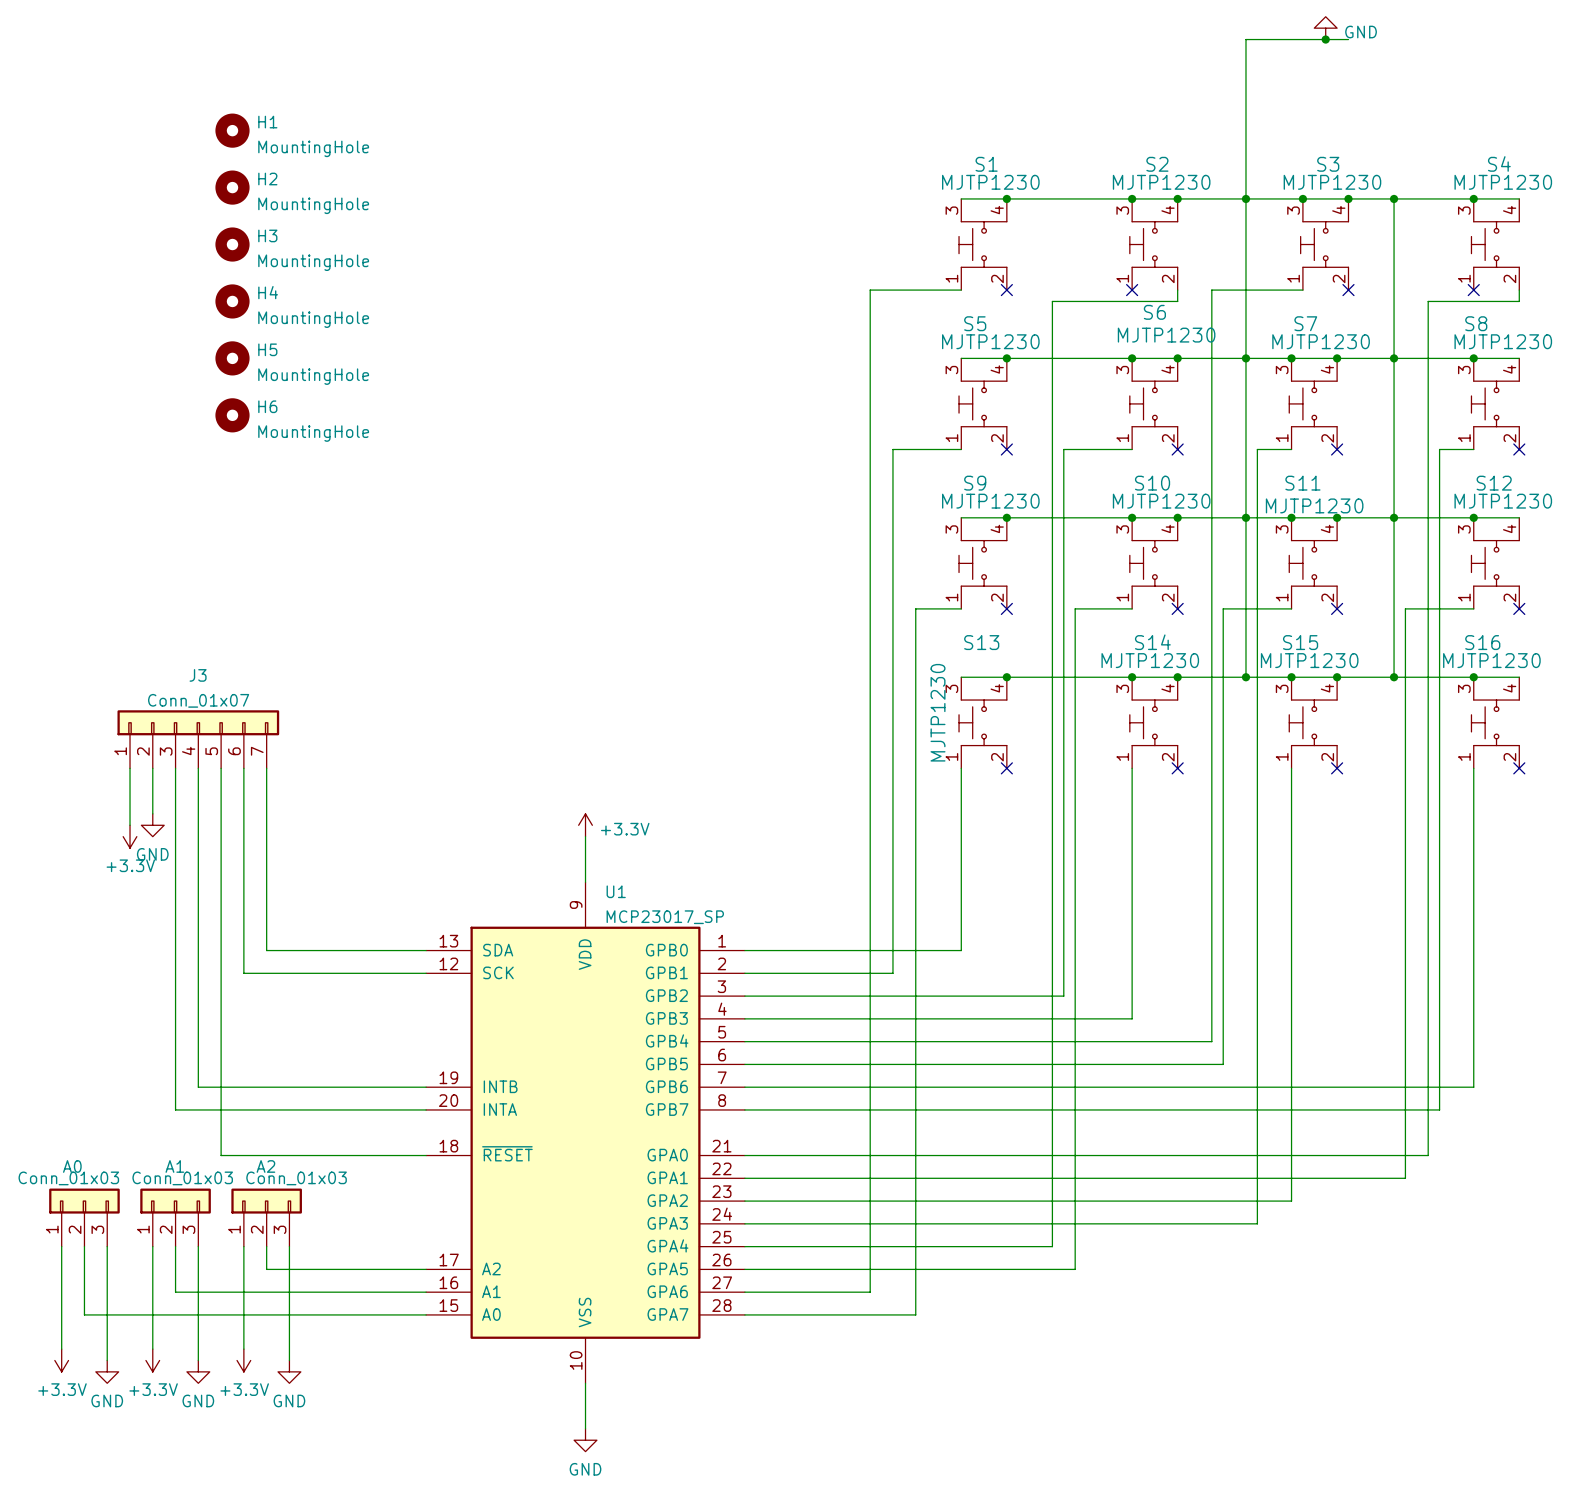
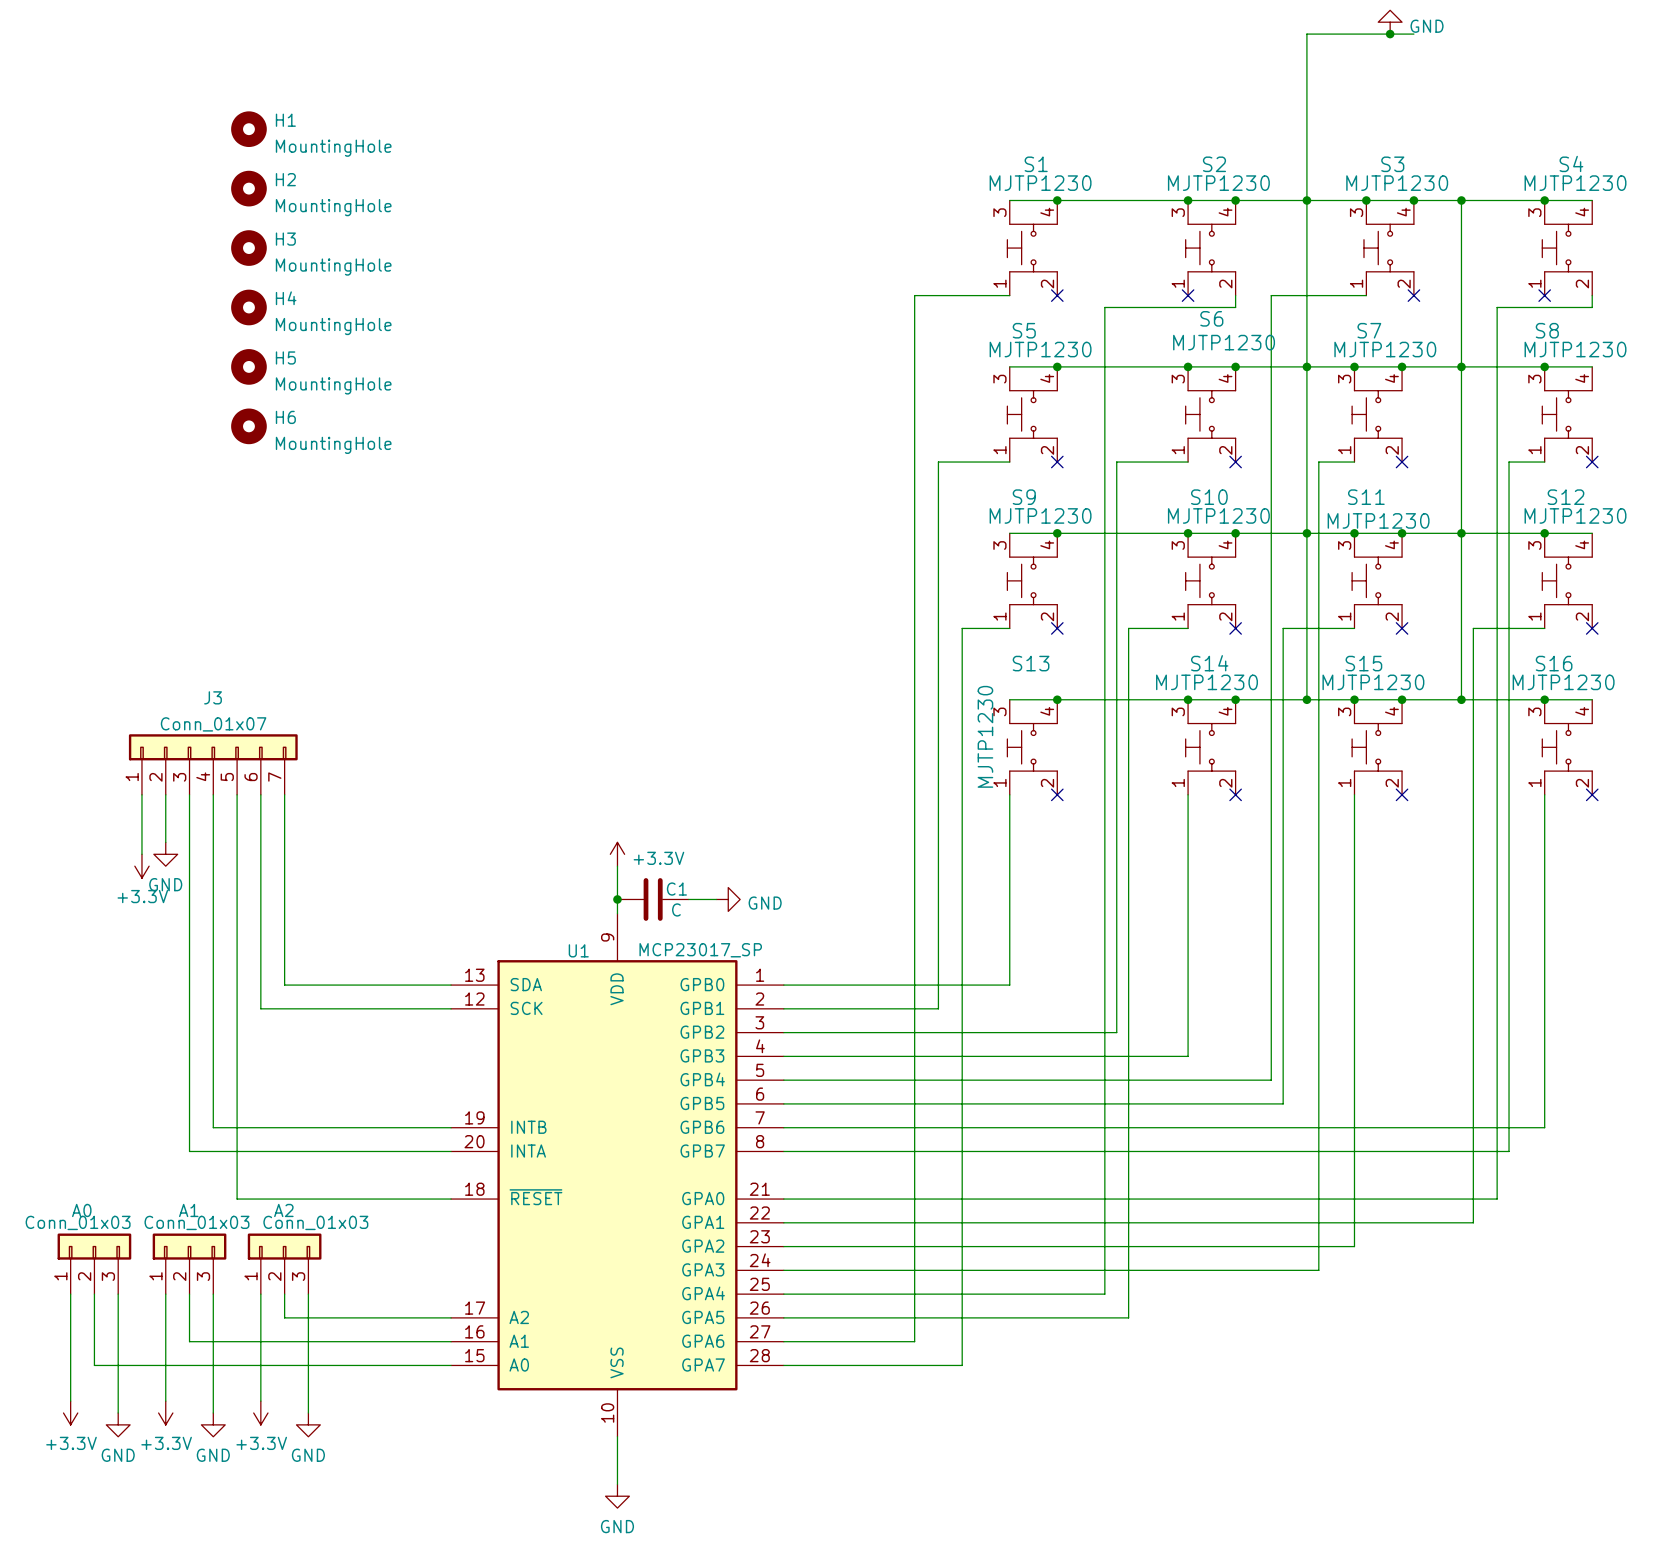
junction: none -> (617, 899)
C1: none -> C (653, 899)
wire: none -> (688, 899) (716, 899)
power symbol: none -> GND (728, 899)
U1 name position: U1 (616, 891) -> U1 (578, 950)

